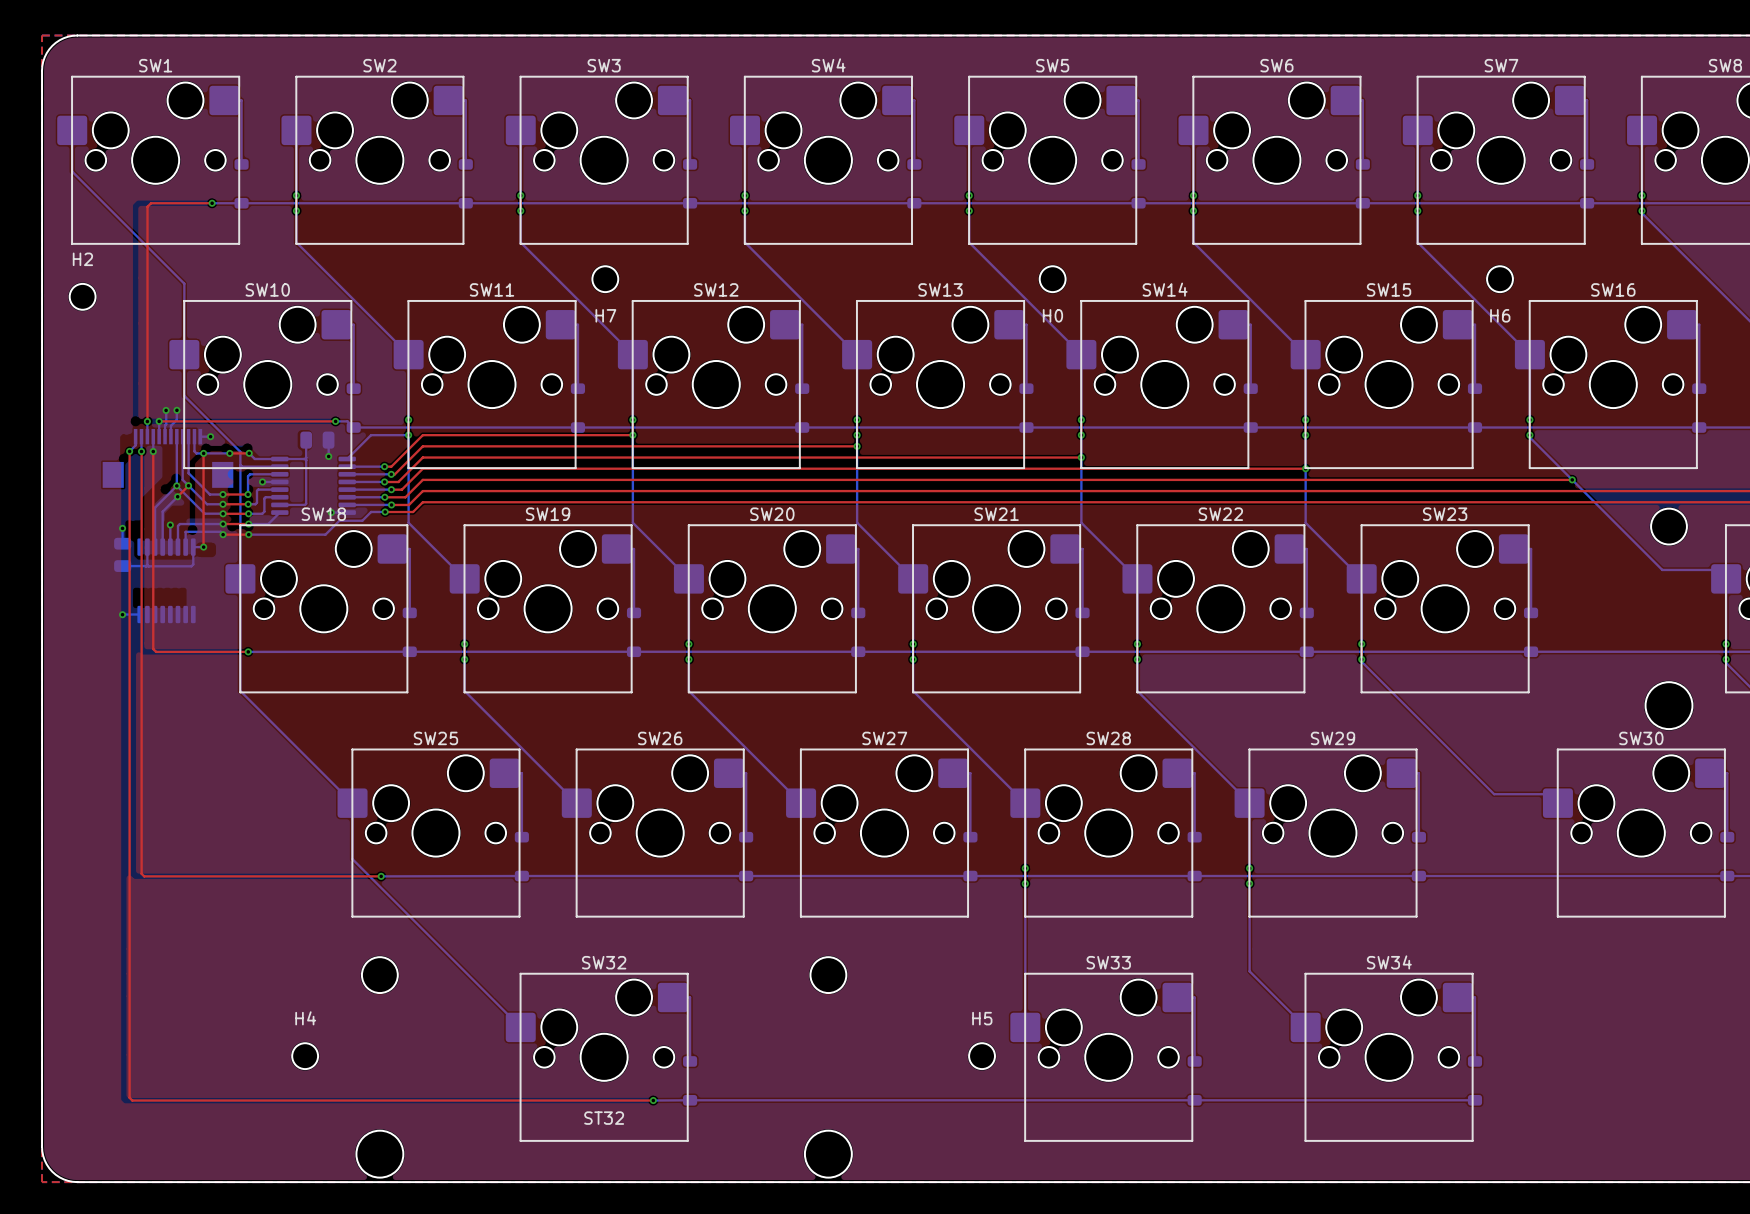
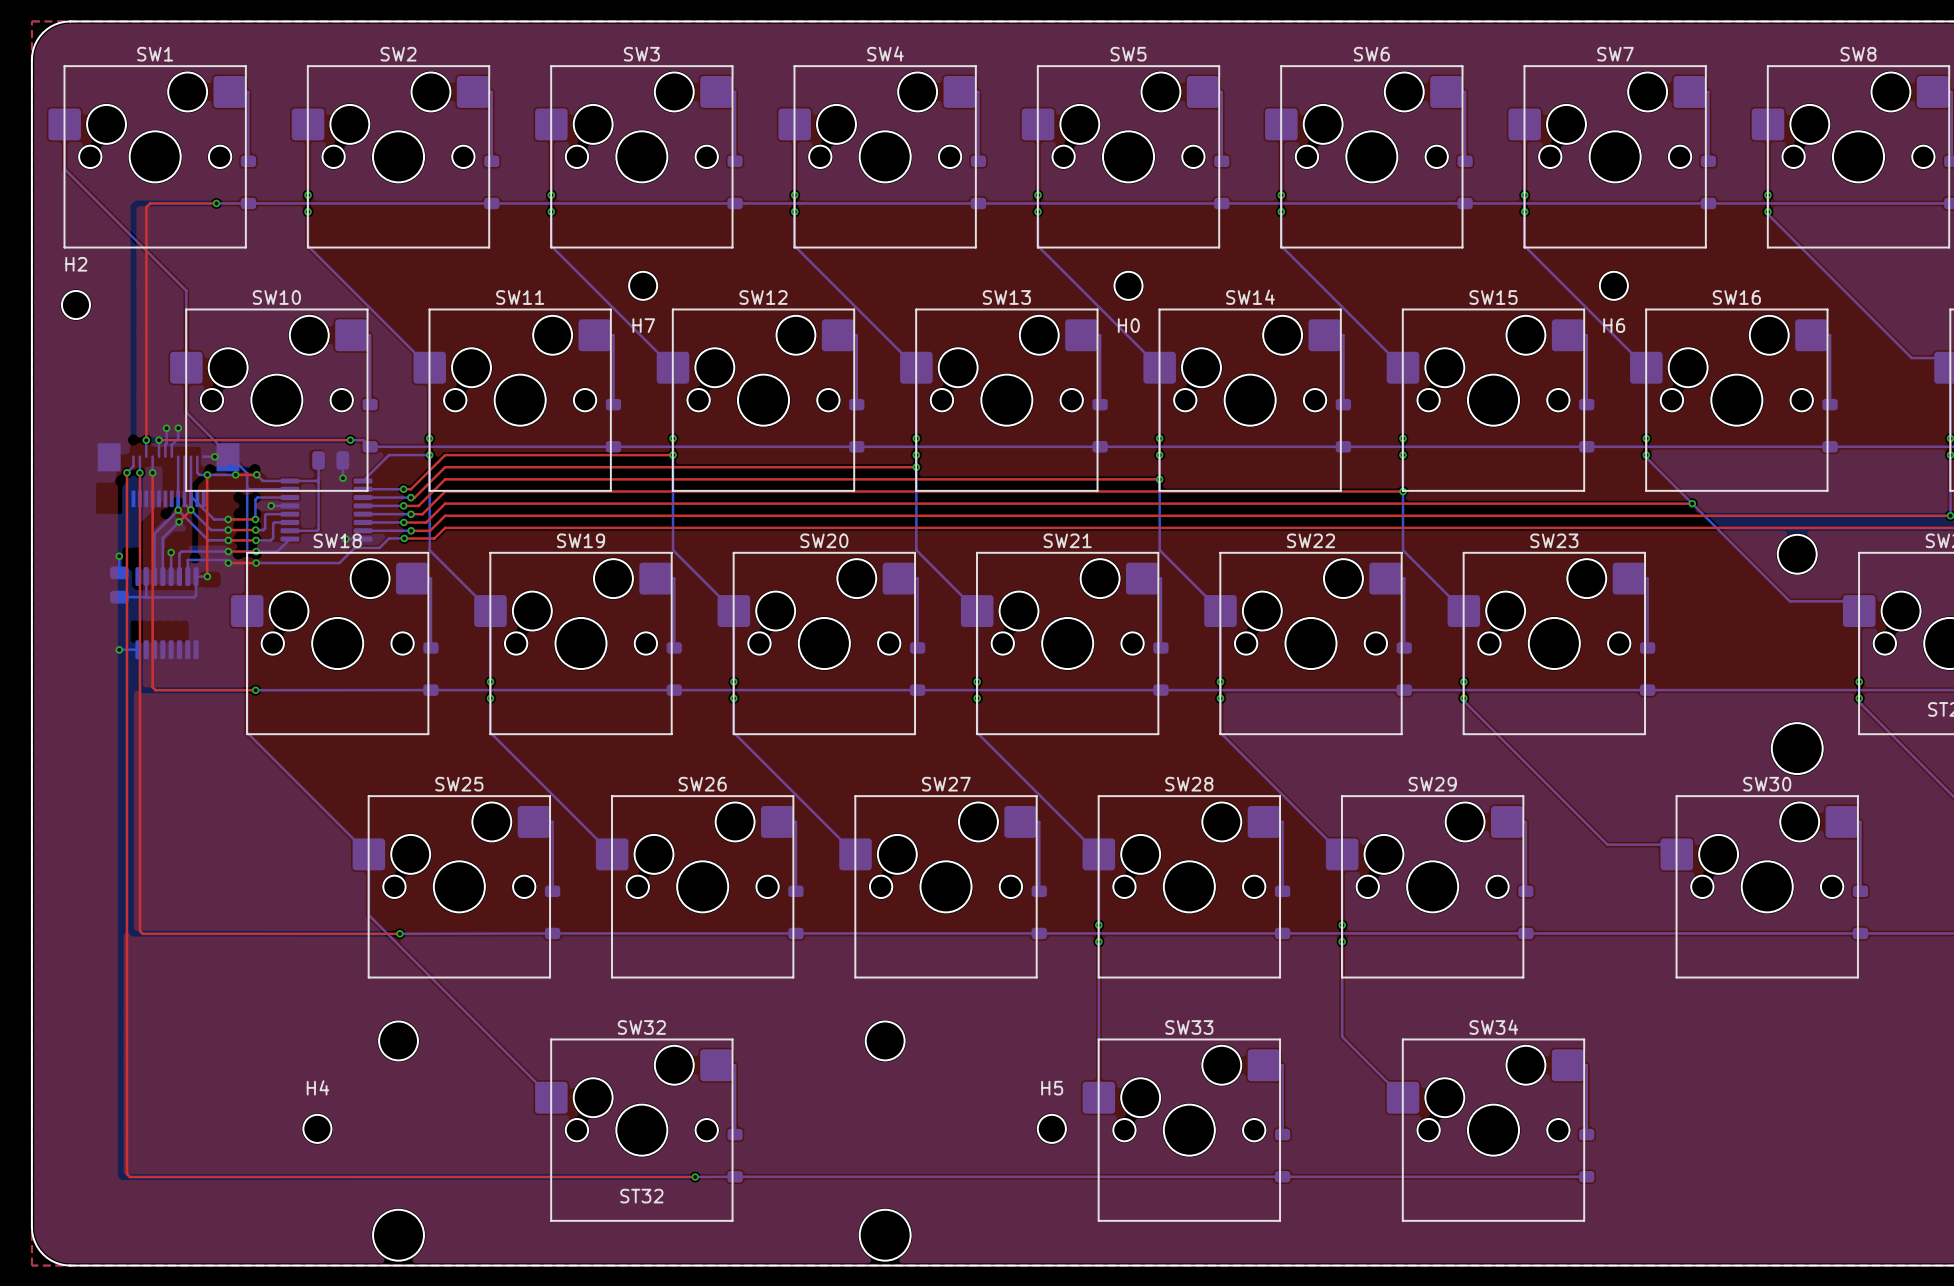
part rotation: 0° (167, 458) -> 180° (168, 475)

